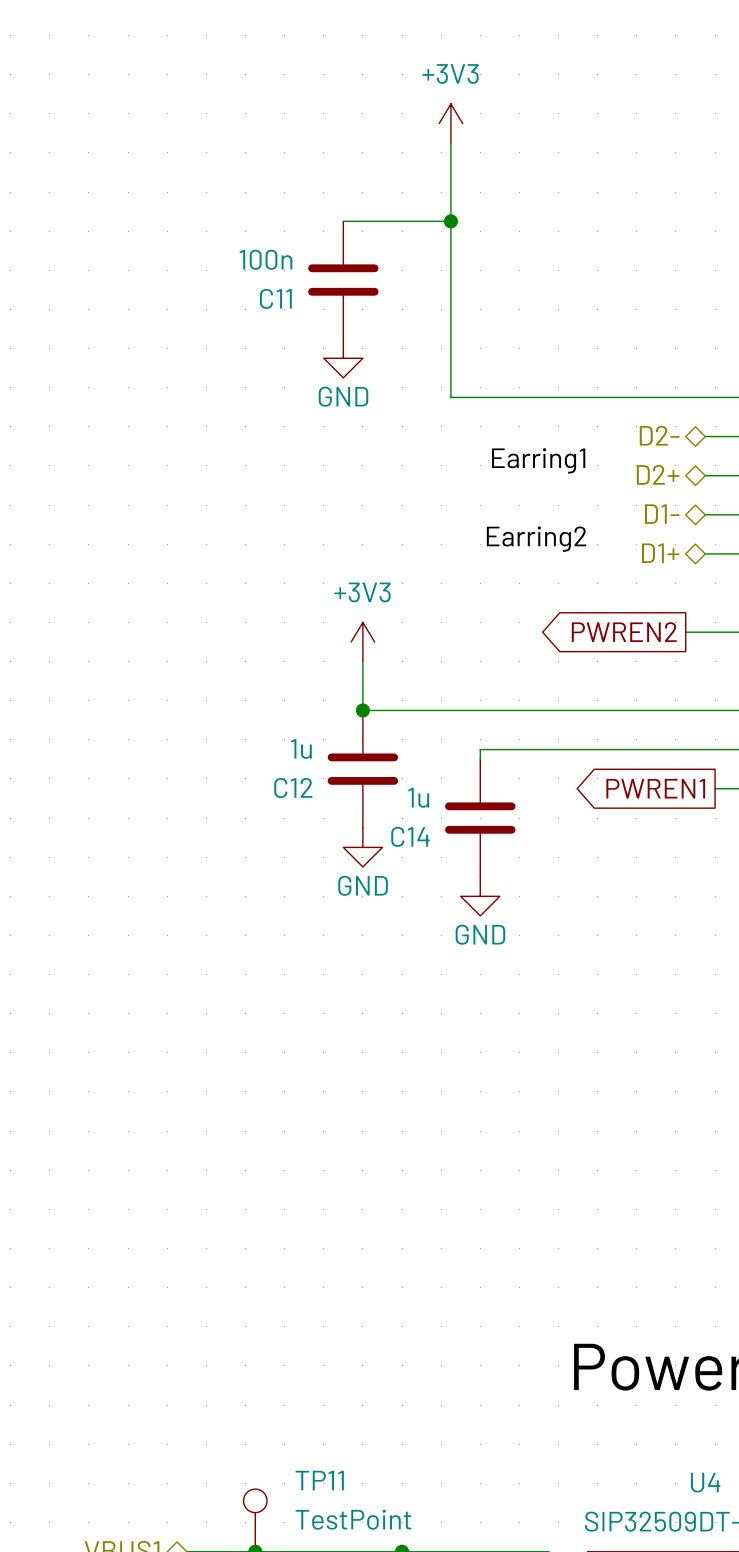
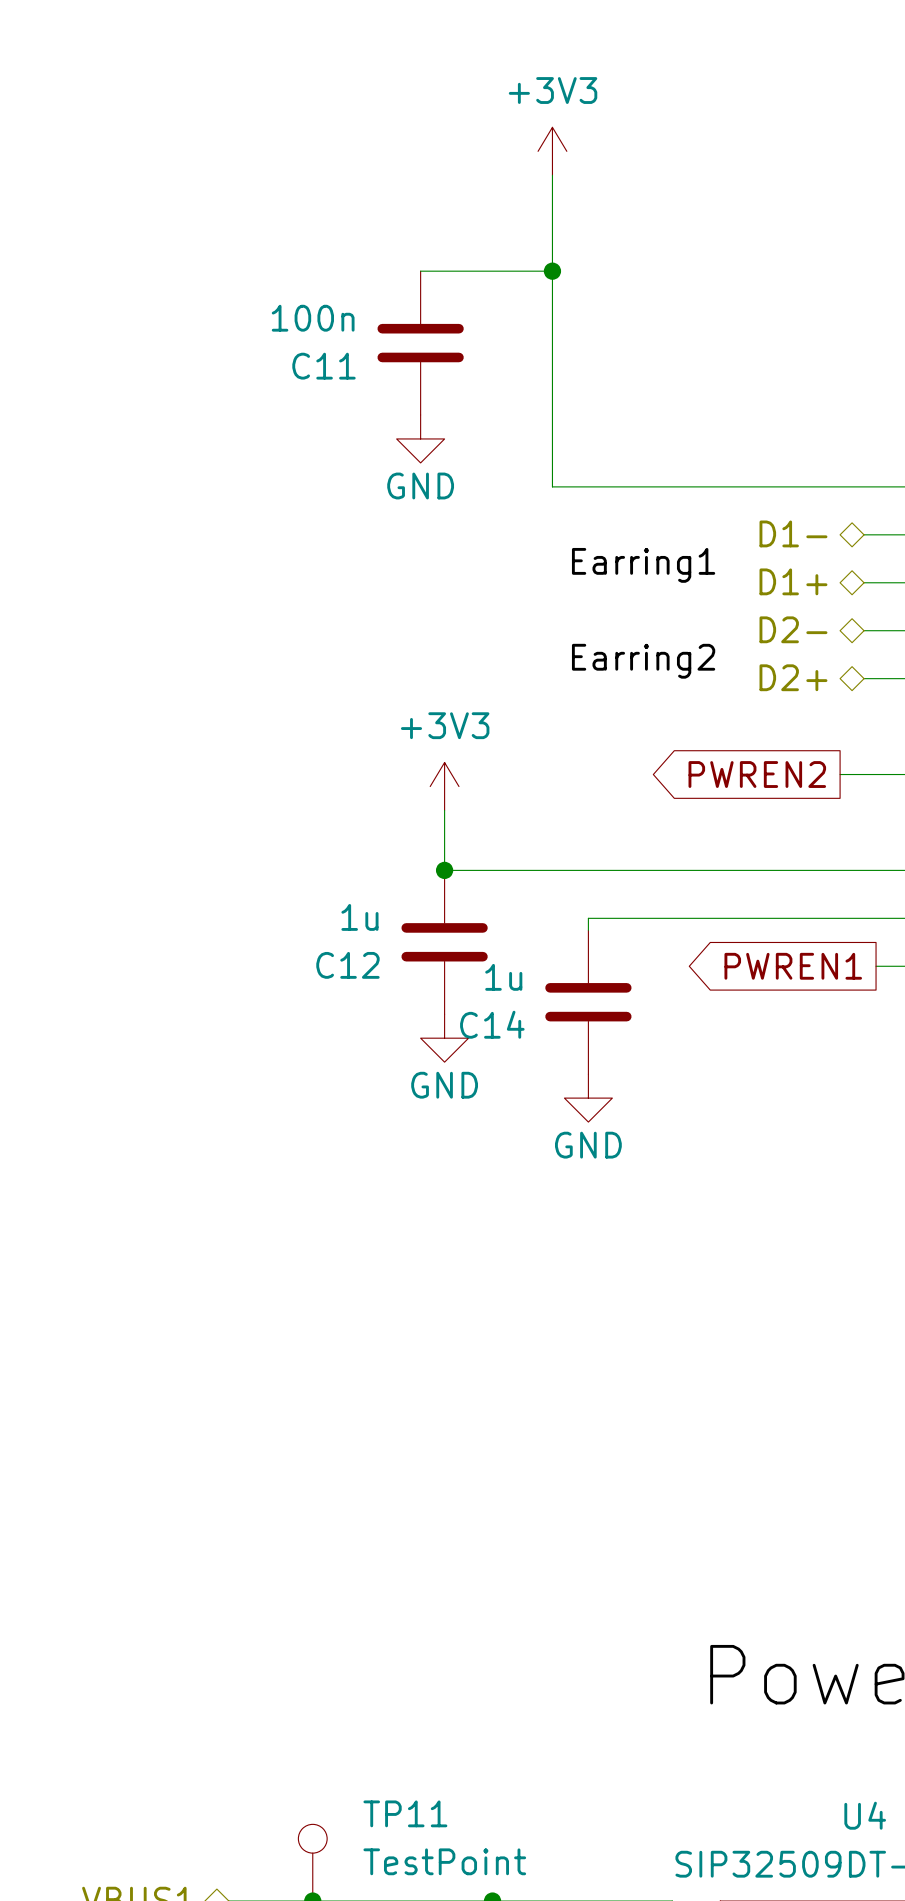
hierarchical label: D2- (659, 435) -> D1- (793, 533)
hierarchical label: D2+ (658, 474) -> D1+ (793, 581)
hierarchical label: D1- (662, 514) -> D2- (793, 629)
hierarchical label: D1+ (660, 553) -> D2+ (793, 677)

